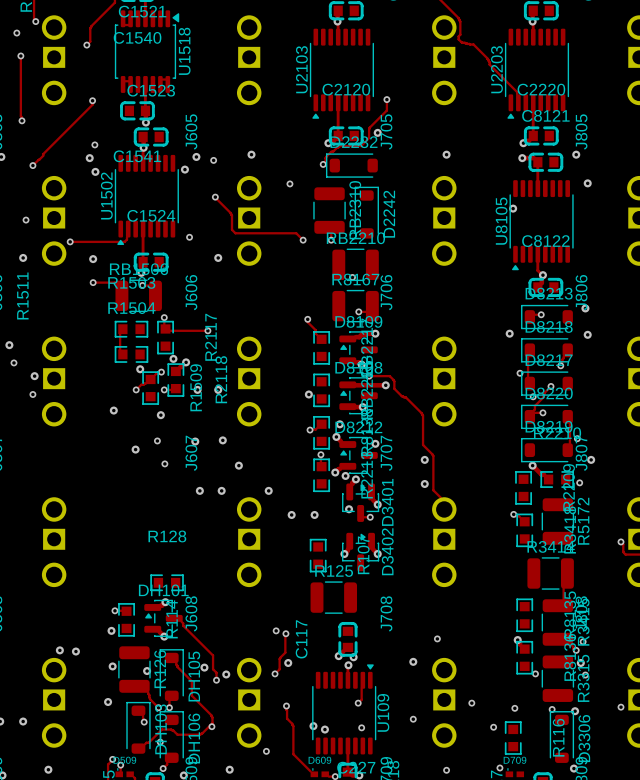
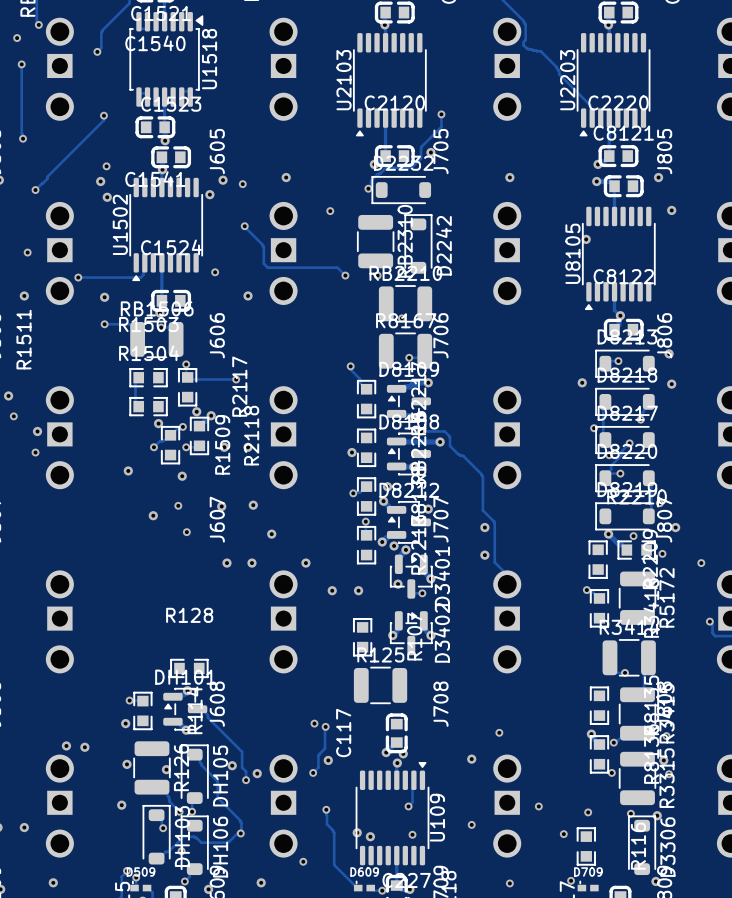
via: none -> (633, 536)
via: none -> (701, 563)
track: none -> (617, 672) (625, 672)
via: none -> (625, 672)
track: none -> (620, 738) (613, 742)
track: (571, 645) (576, 650) -> none
via: none -> (613, 742)
via: (576, 650) -> none
via: (620, 707) -> none

